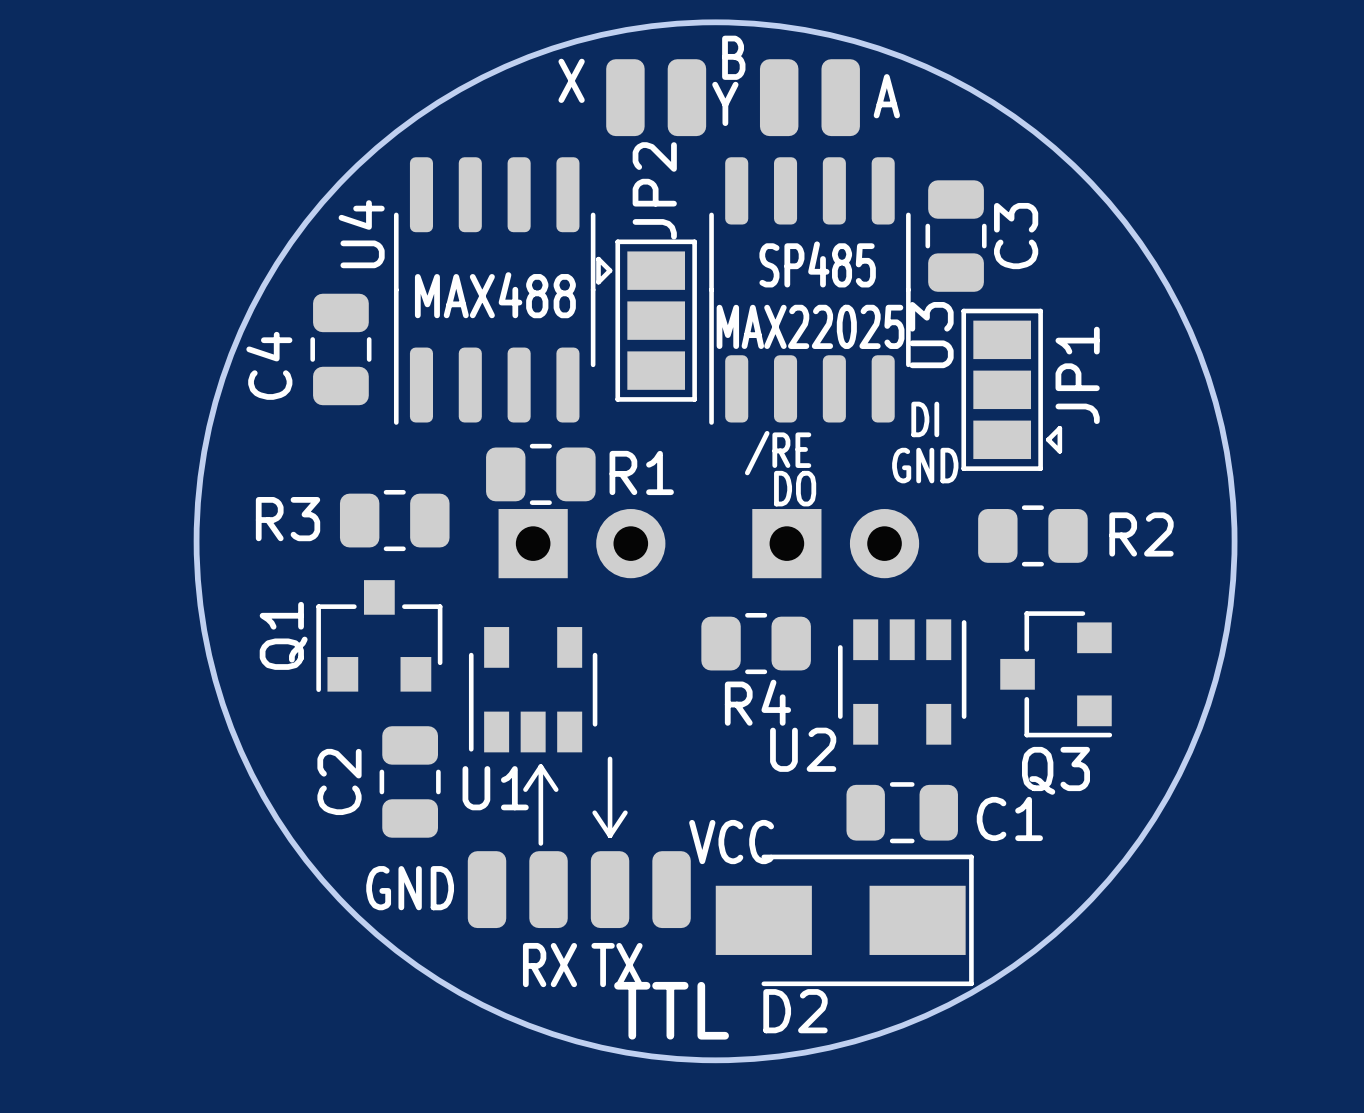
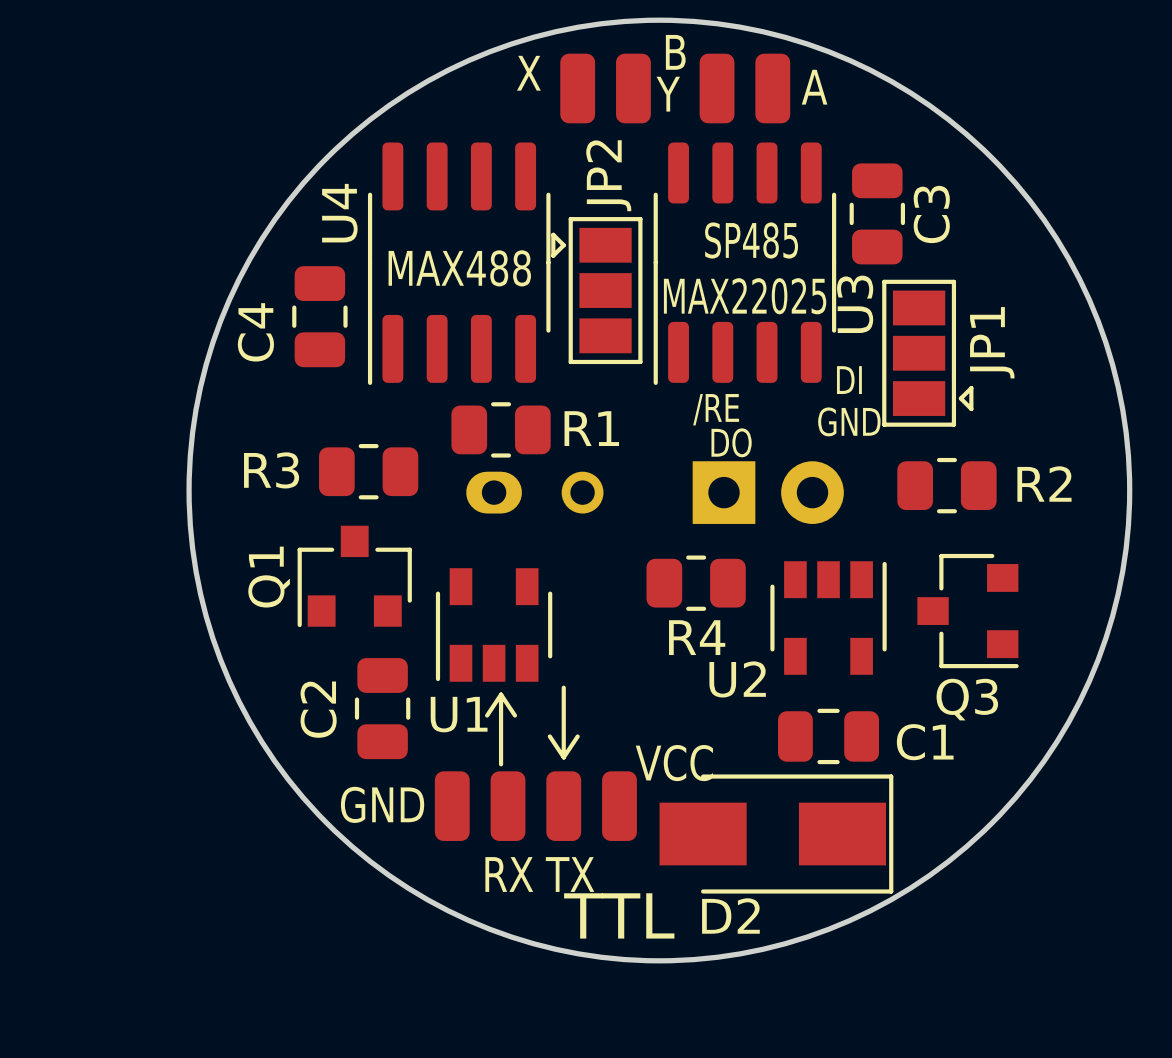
part footprint: [498, 509, 666, 579] -> [466, 471, 604, 514]

